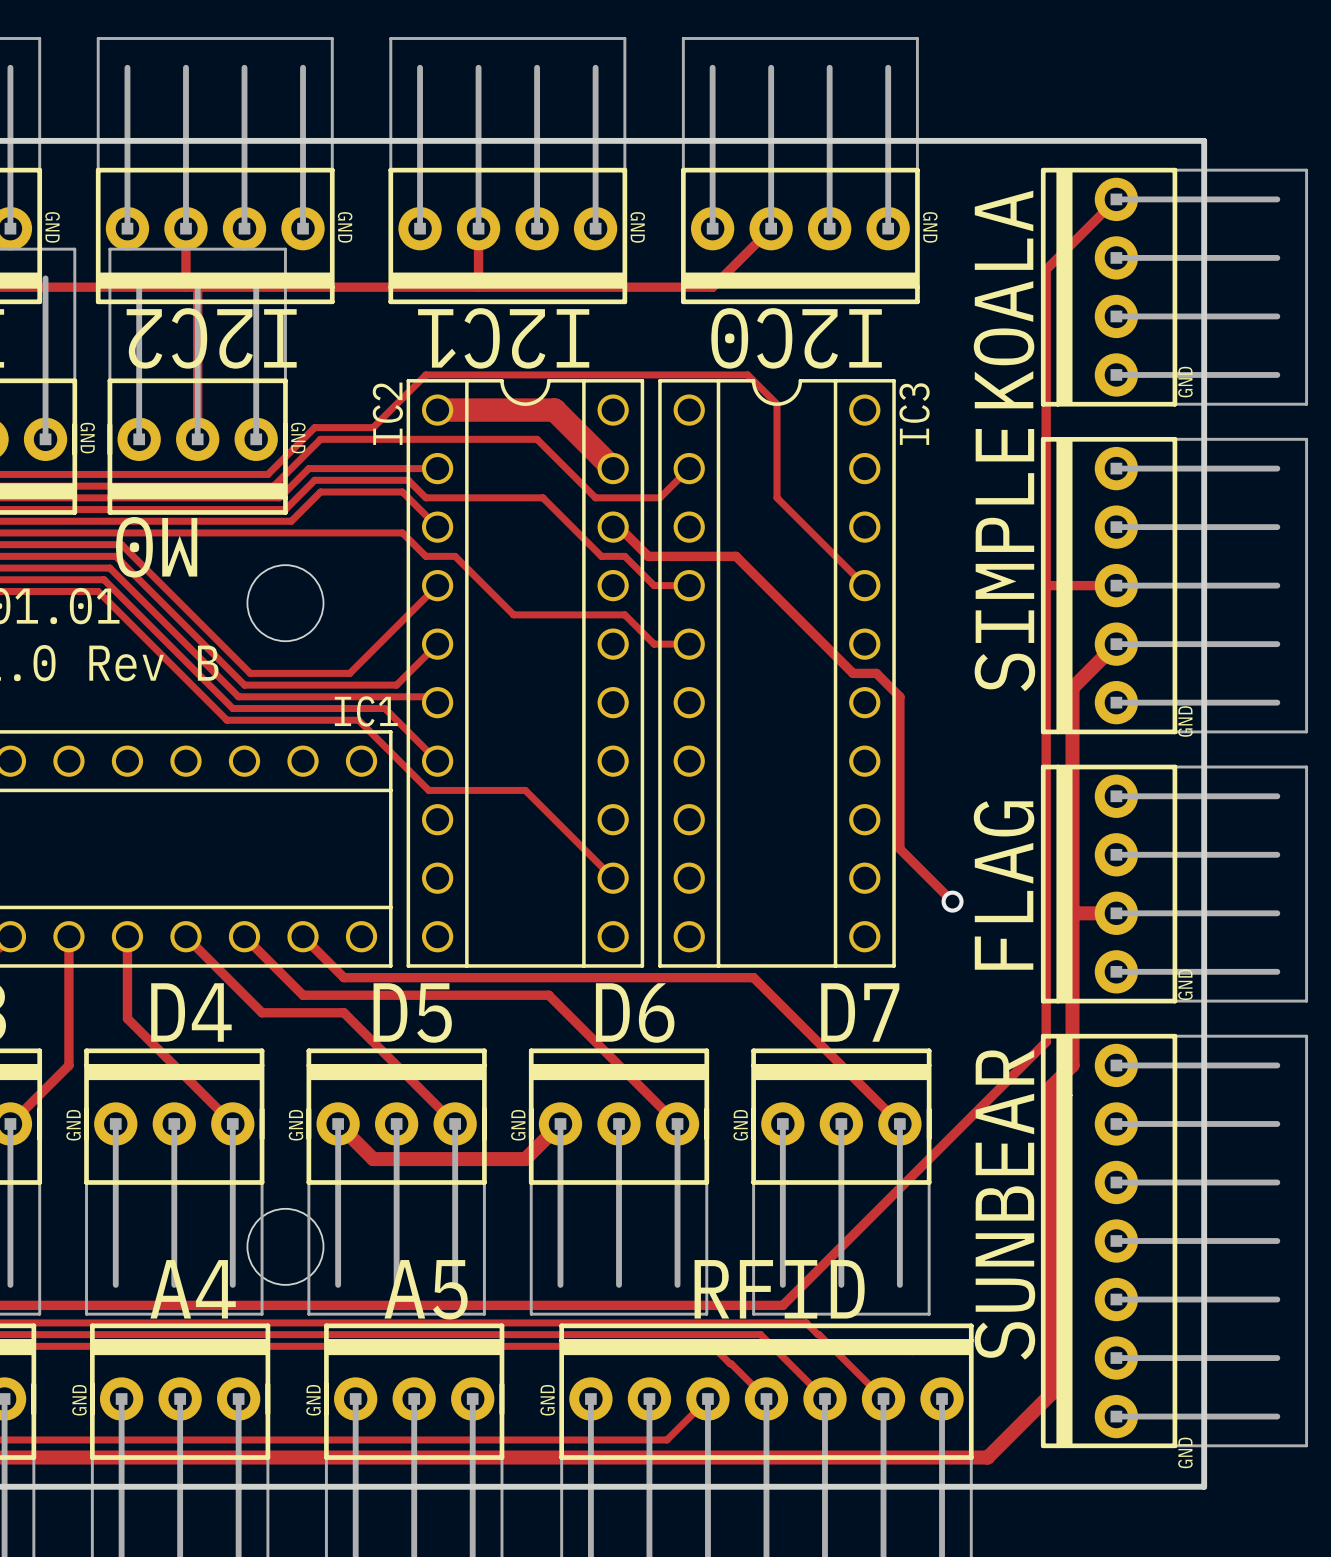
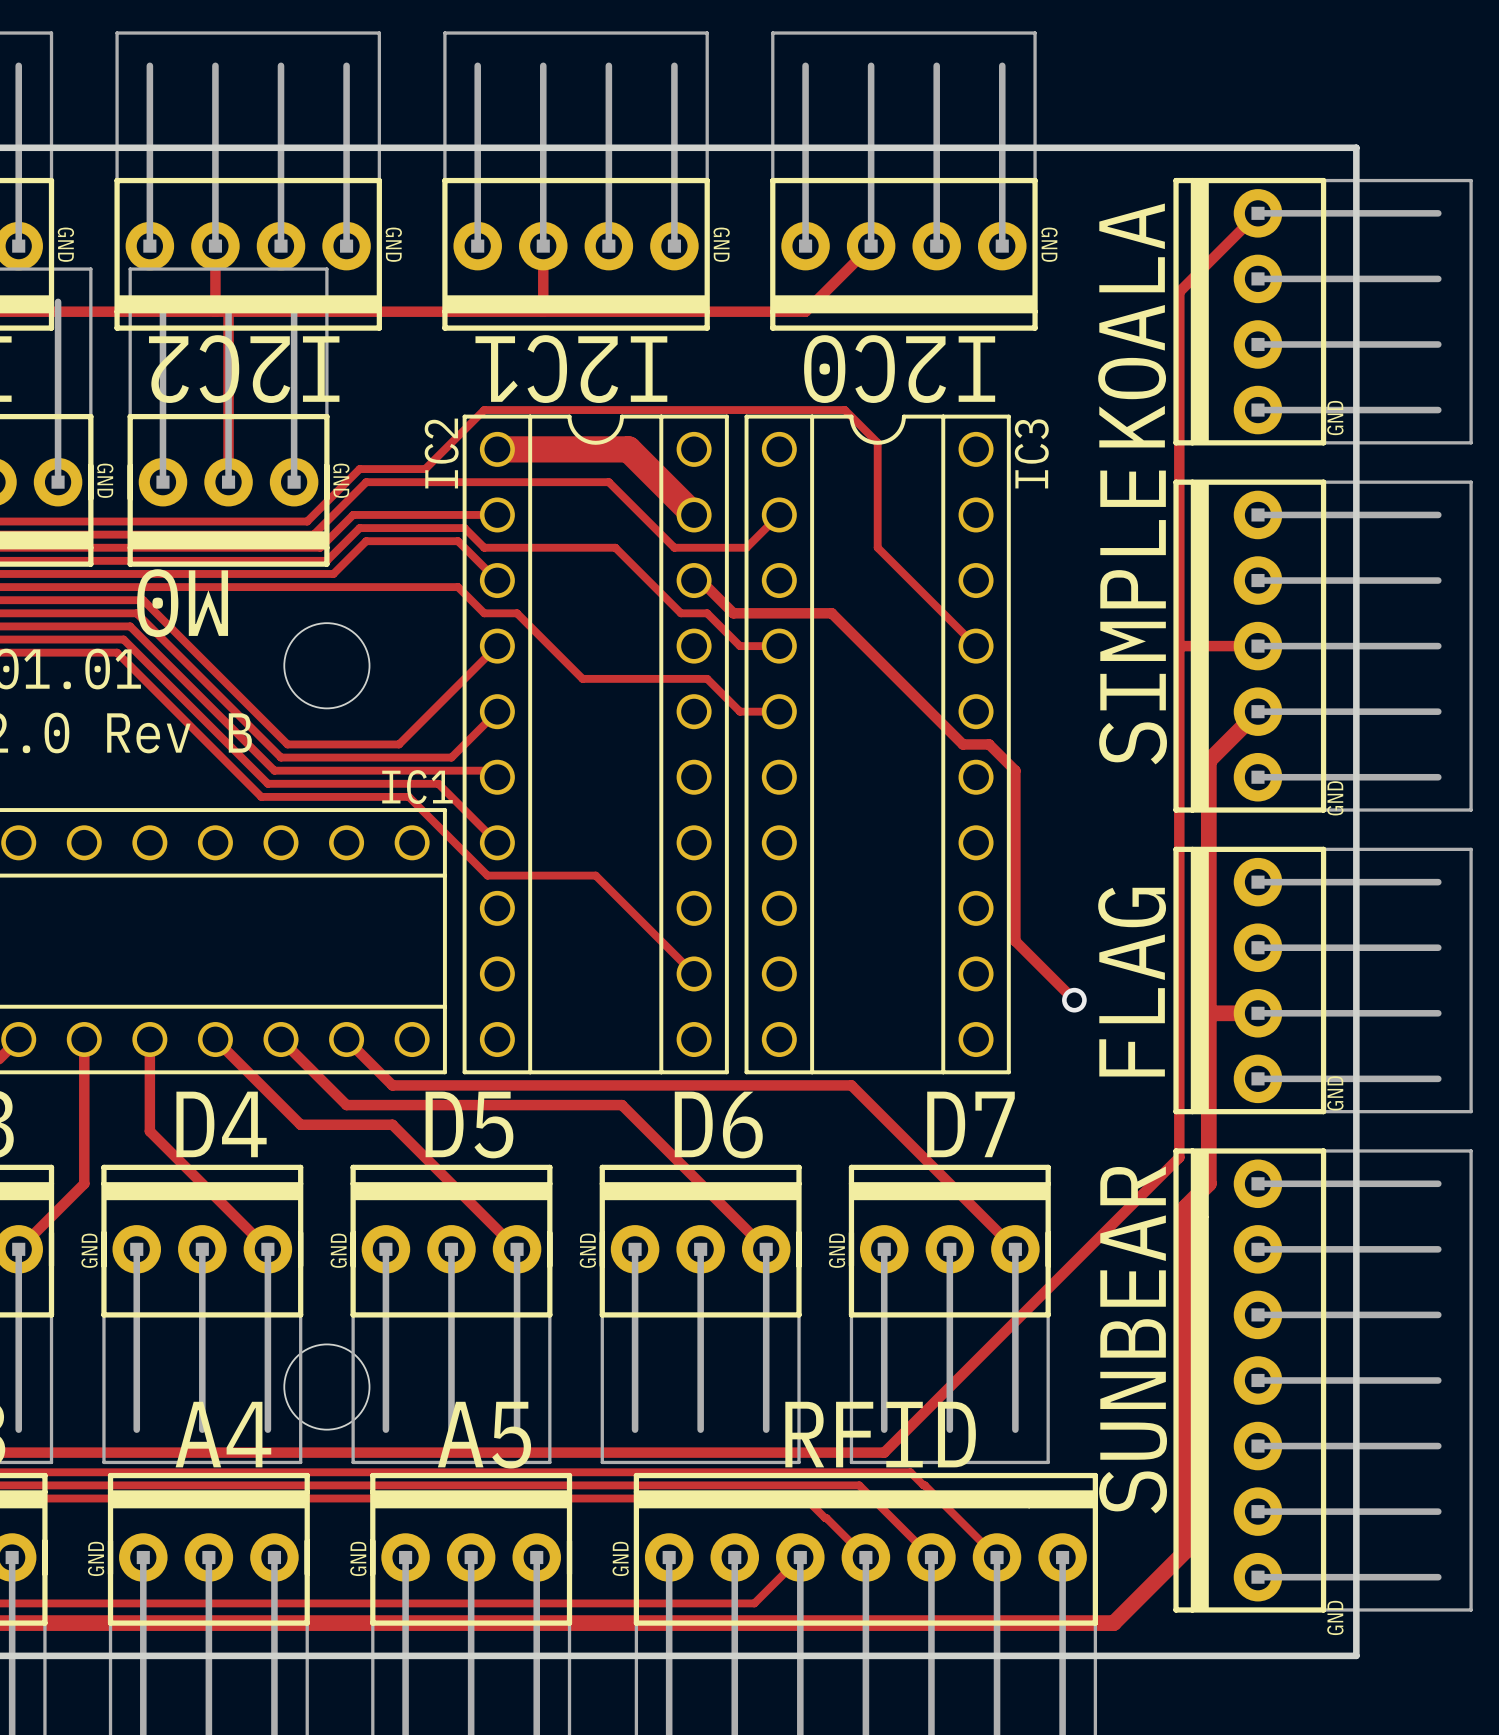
track: (338, 1123) (373, 1159) (525, 1159) (560, 1123) -> none

